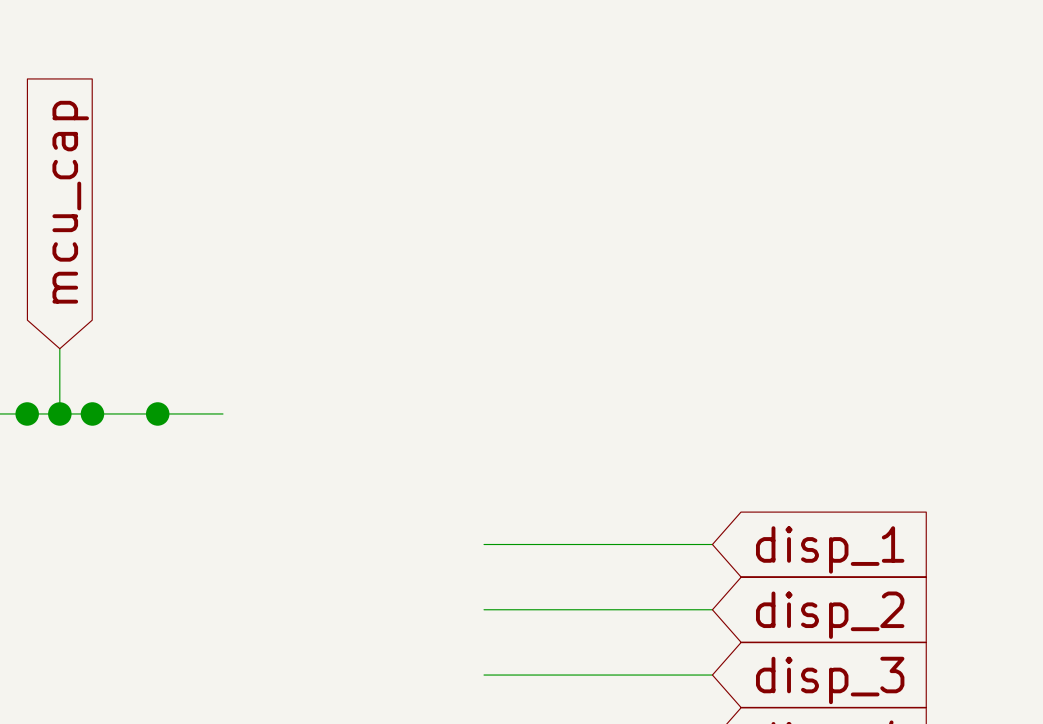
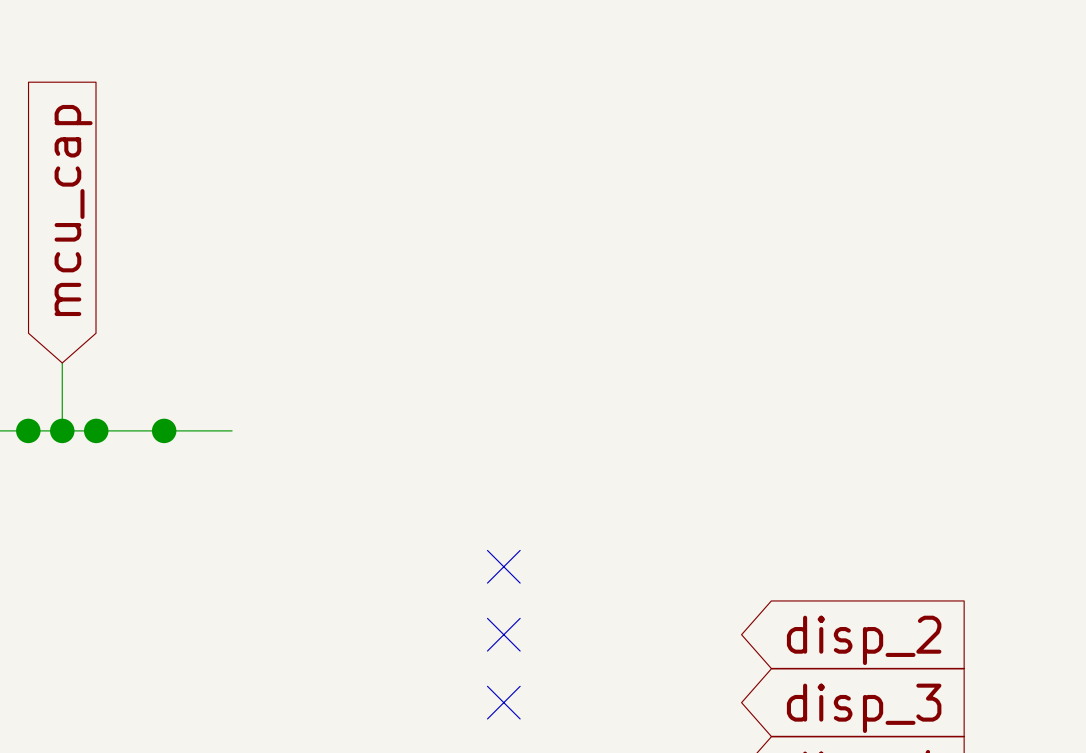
wire: (484, 544) (712, 544) -> none
no-connect mark: none -> (503, 566)
global label: disp_1 (830, 549) -> none
wire: (484, 609) (712, 609) -> none
no-connect mark: none -> (503, 634)
wire: (484, 675) (712, 675) -> none
no-connect mark: none -> (503, 702)

